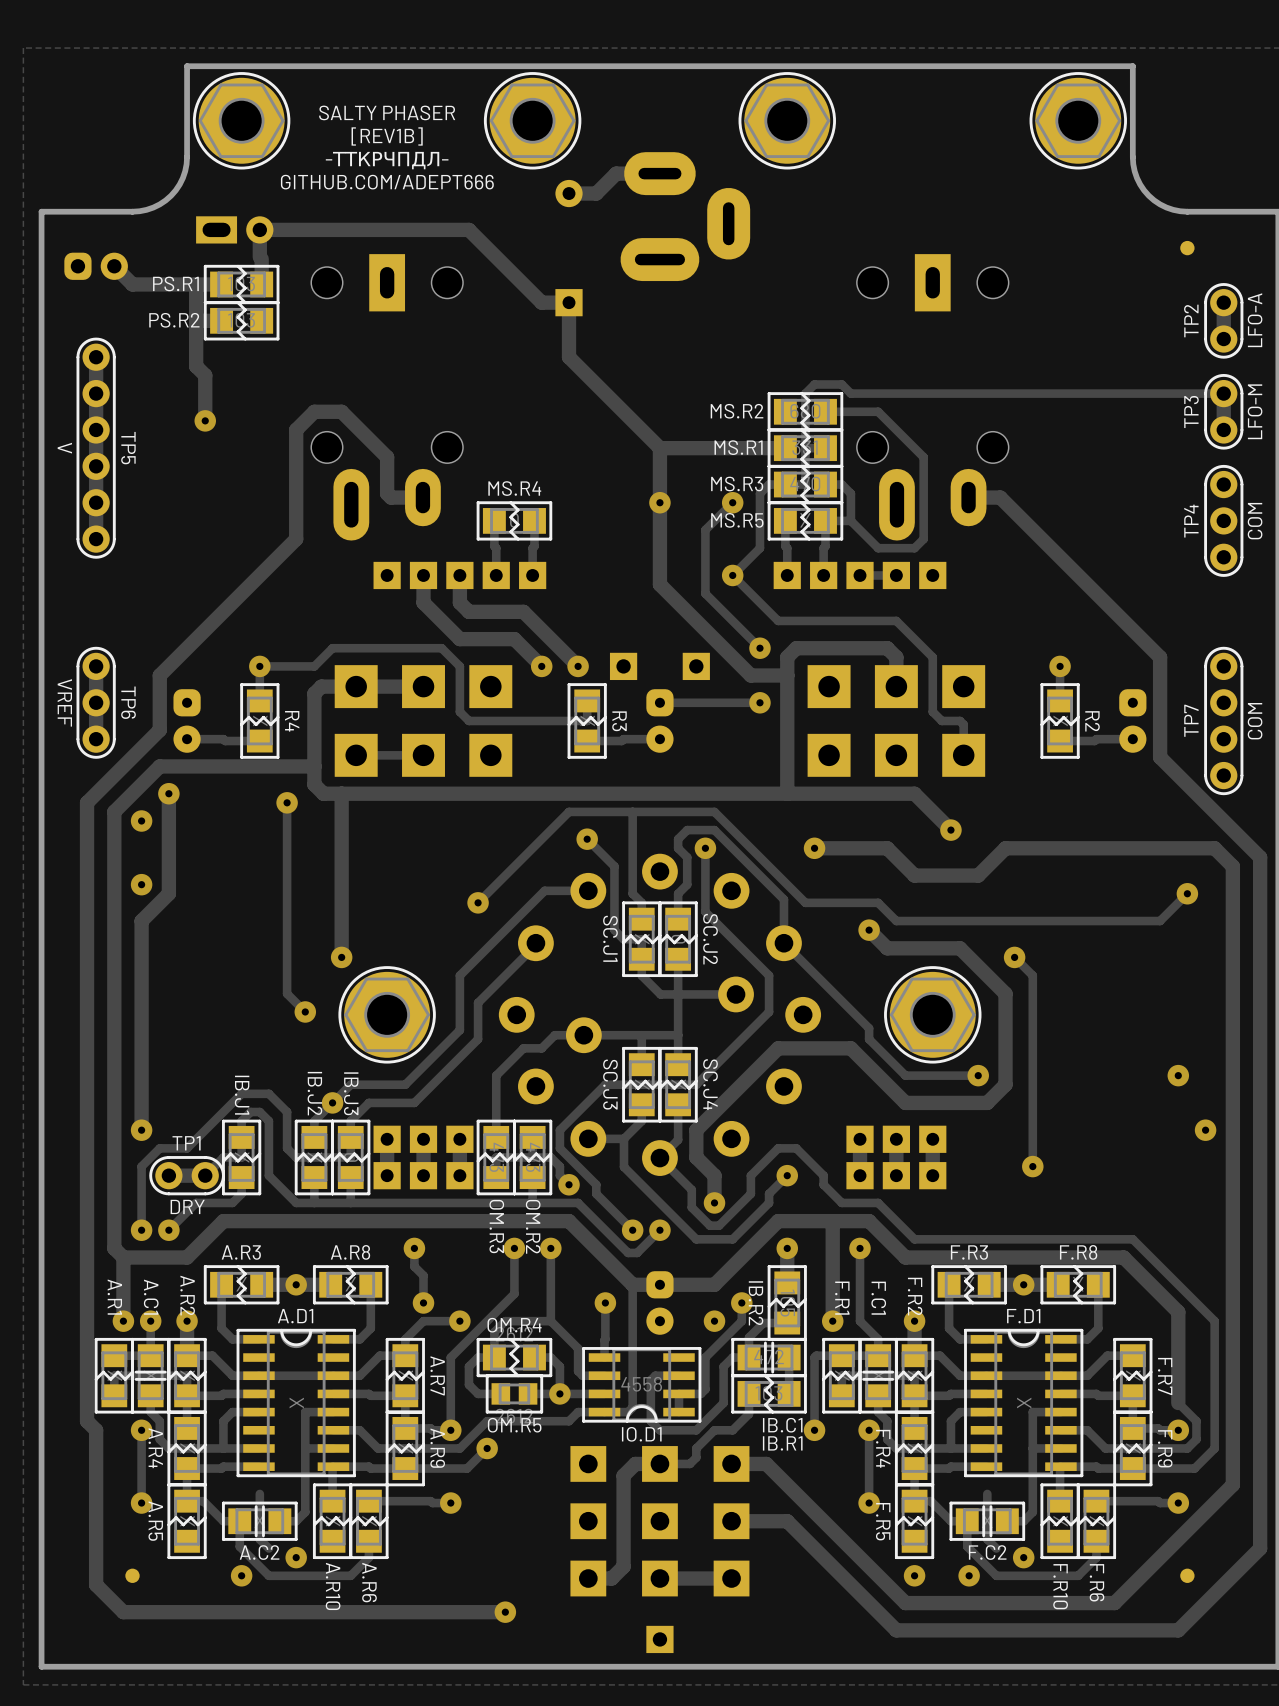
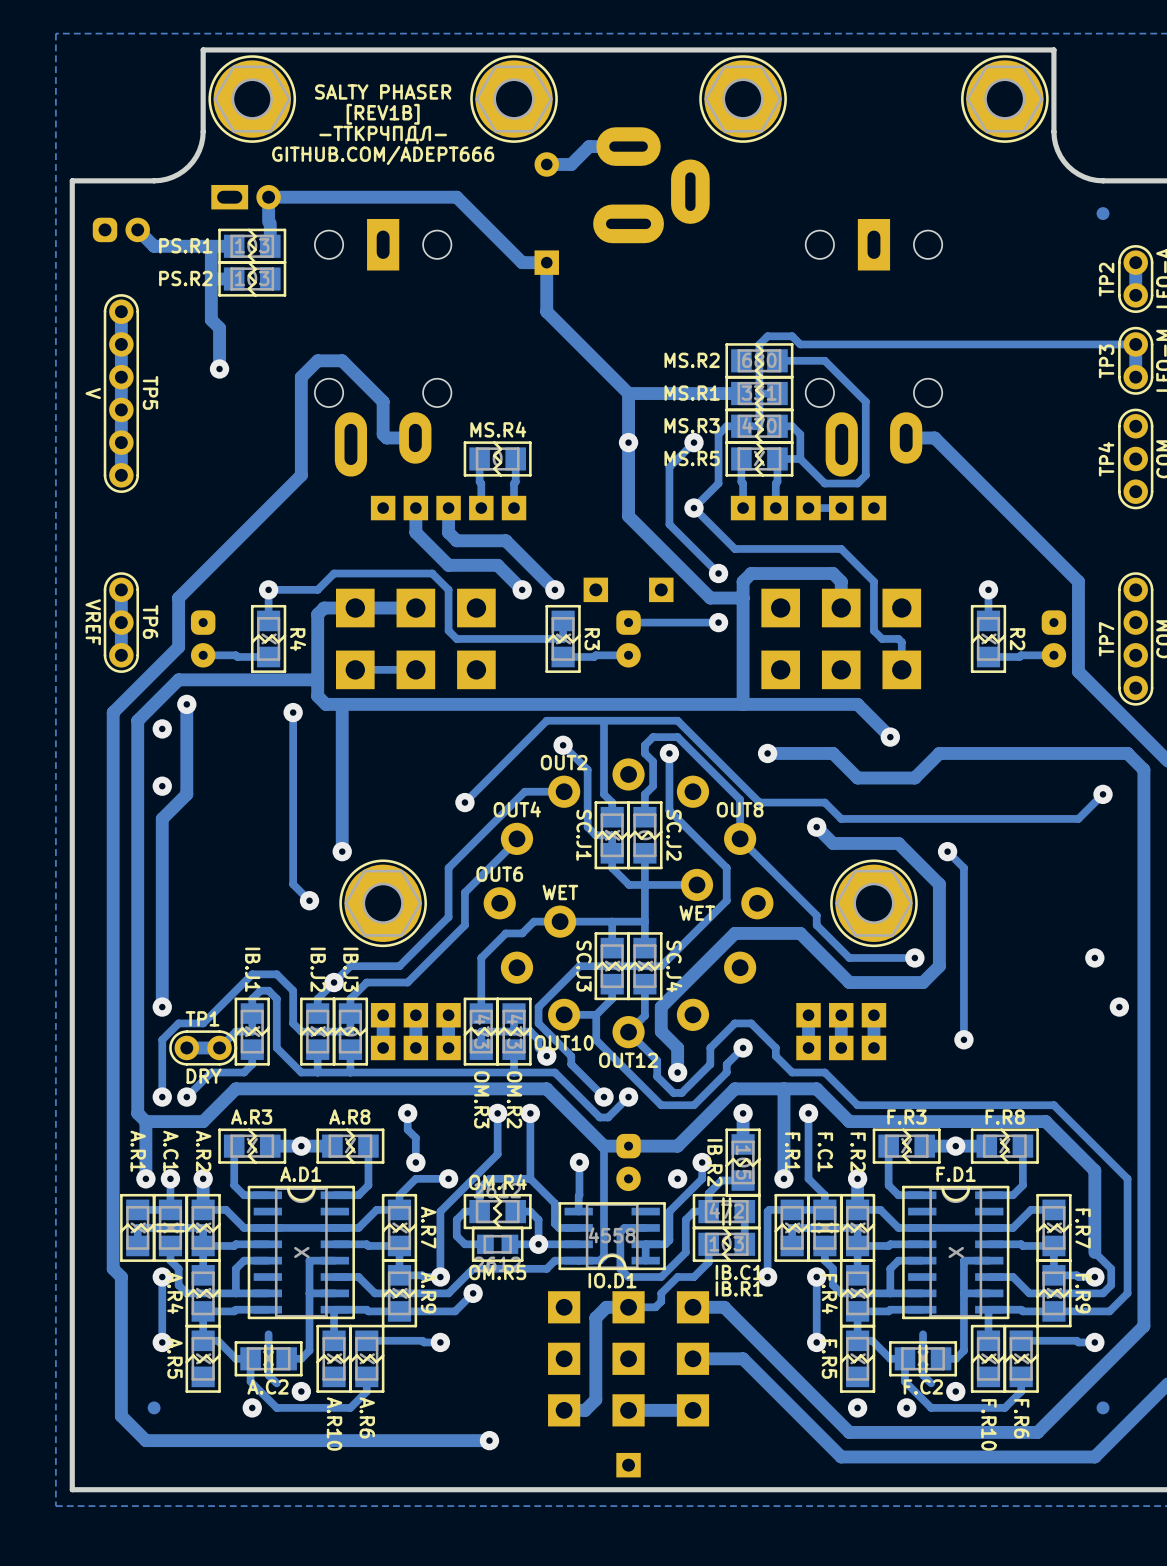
text: none -> OUT2 (564, 762)
text: none -> OUT4 (517, 809)
text: none -> OUT8 (740, 809)
text: none -> OUT6 (499, 874)
text: none -> WET (560, 892)
text: none -> WET (697, 913)
text: none -> OUT10 (564, 1043)
text: none -> OUT12 (628, 1060)

